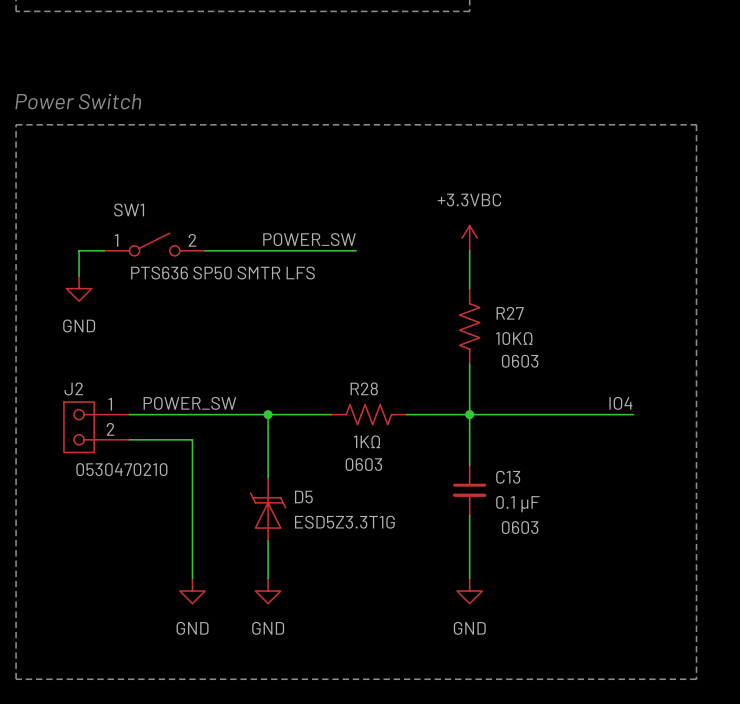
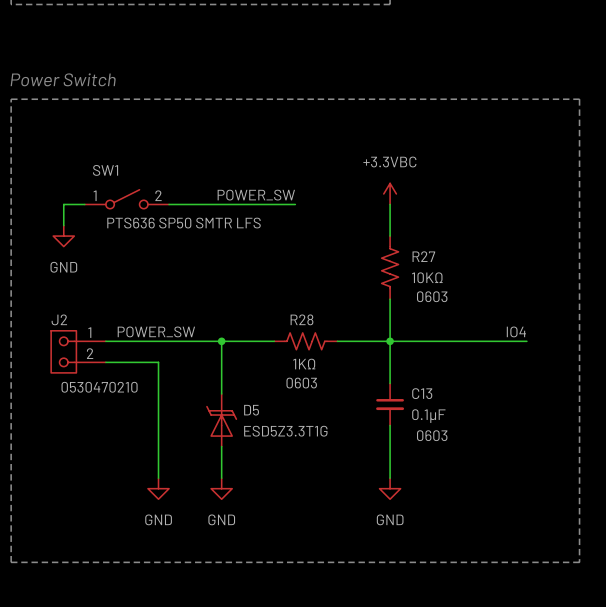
C13 value: 0.1 µF (517, 504) -> 0.1µF (428, 416)

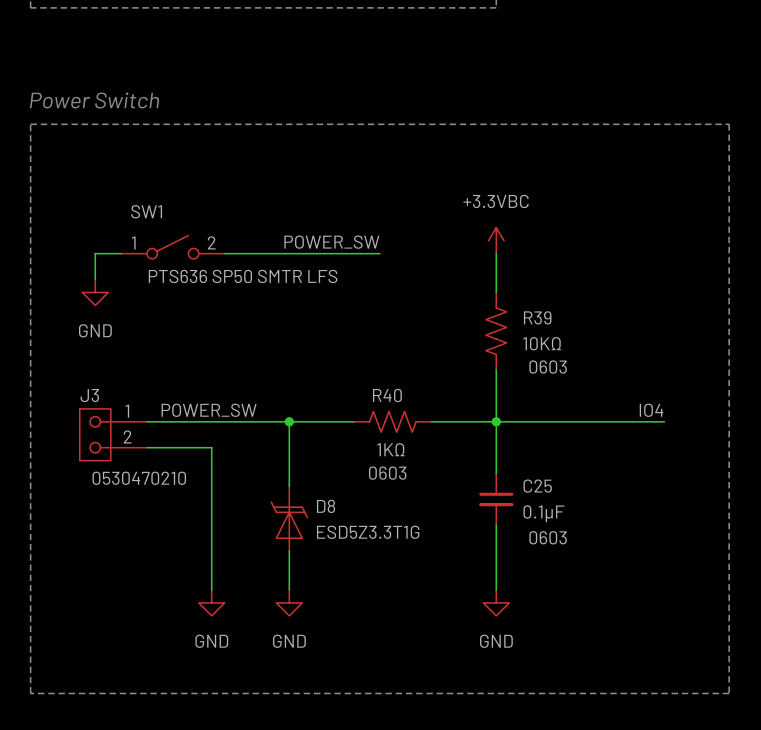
R27 name: R27 (423, 256) -> R39 (537, 317)
J2 name: J2 (59, 319) -> J3 (89, 395)
R28 name: R28 (301, 319) -> R40 (387, 395)
C13 name: C13 (422, 393) -> C25 (537, 486)
D5 name: D5 (251, 410) -> D8 (326, 506)

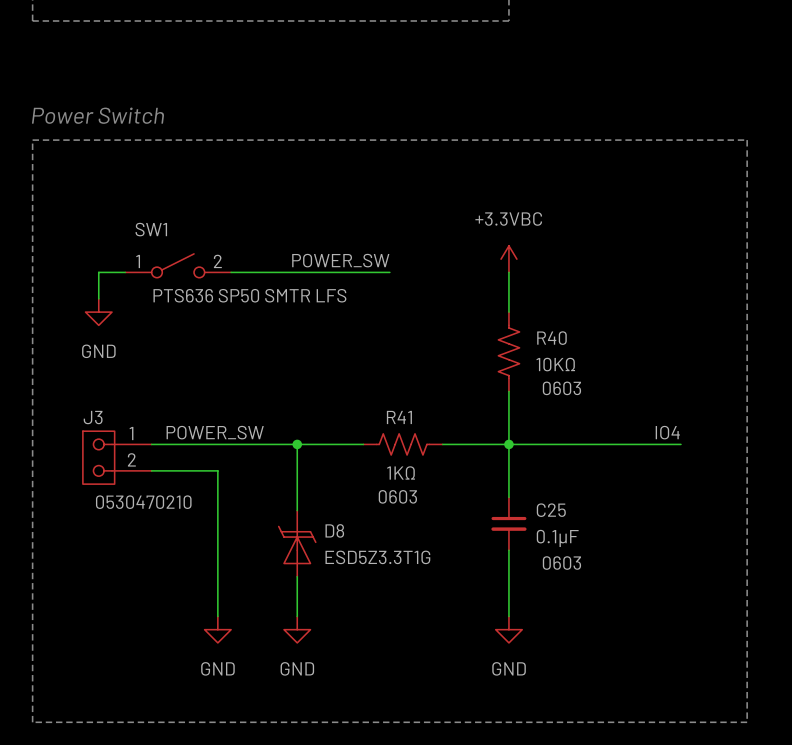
R39 name: R39 (537, 317) -> R40 (551, 338)
R40 name: R40 (387, 395) -> R41 (399, 417)

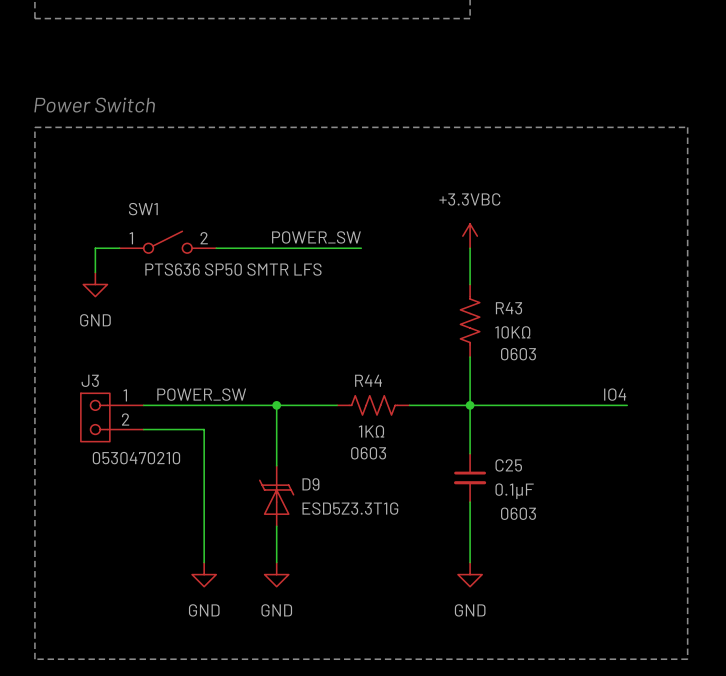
R40 name: R40 (551, 338) -> R43 (509, 308)
R41 name: R41 (399, 417) -> R44 (368, 380)
D8 name: D8 (334, 530) -> D9 (310, 484)

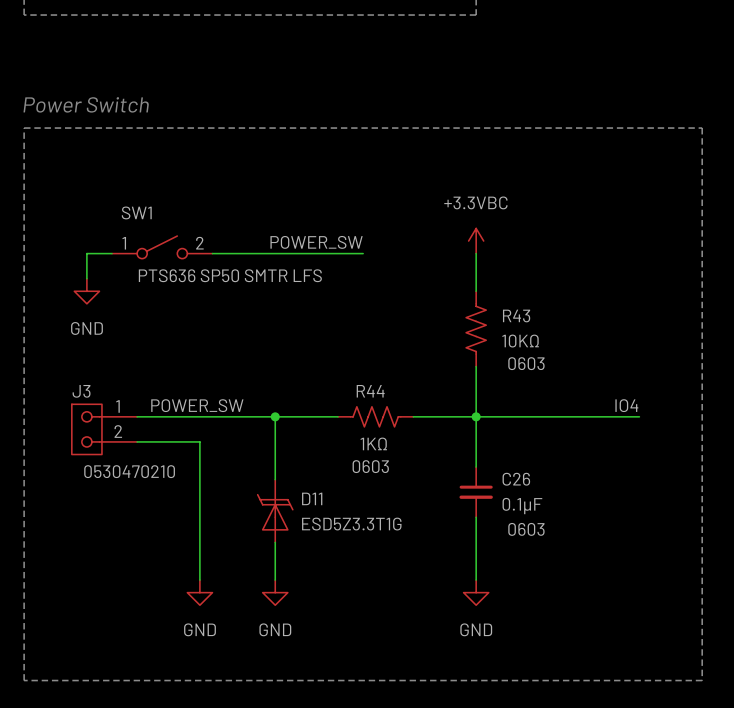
C25 name: C25 (508, 465) -> C26 (516, 479)
D9 name: D9 (310, 484) -> D11 (312, 498)

